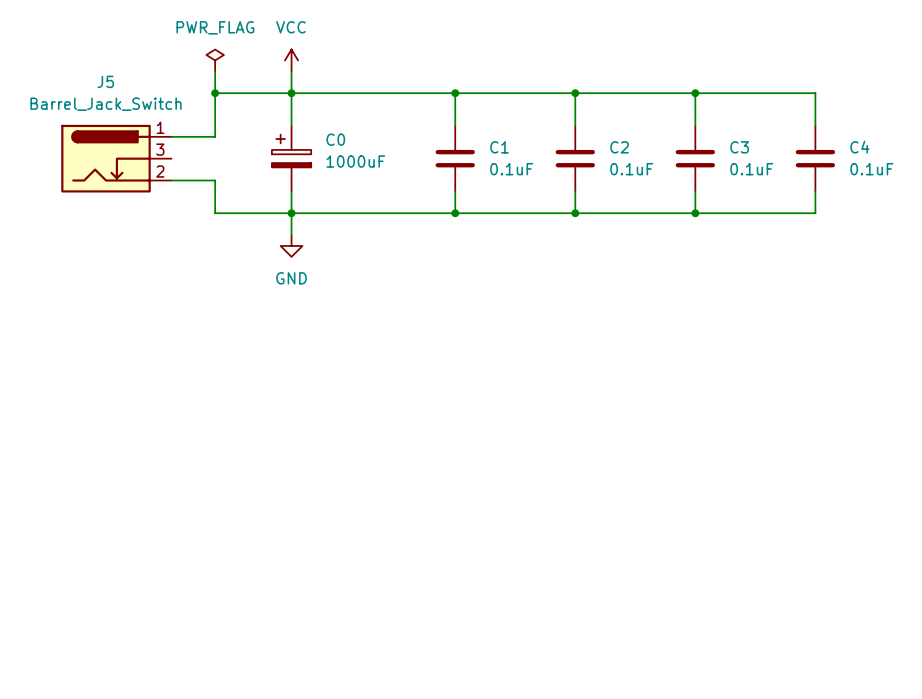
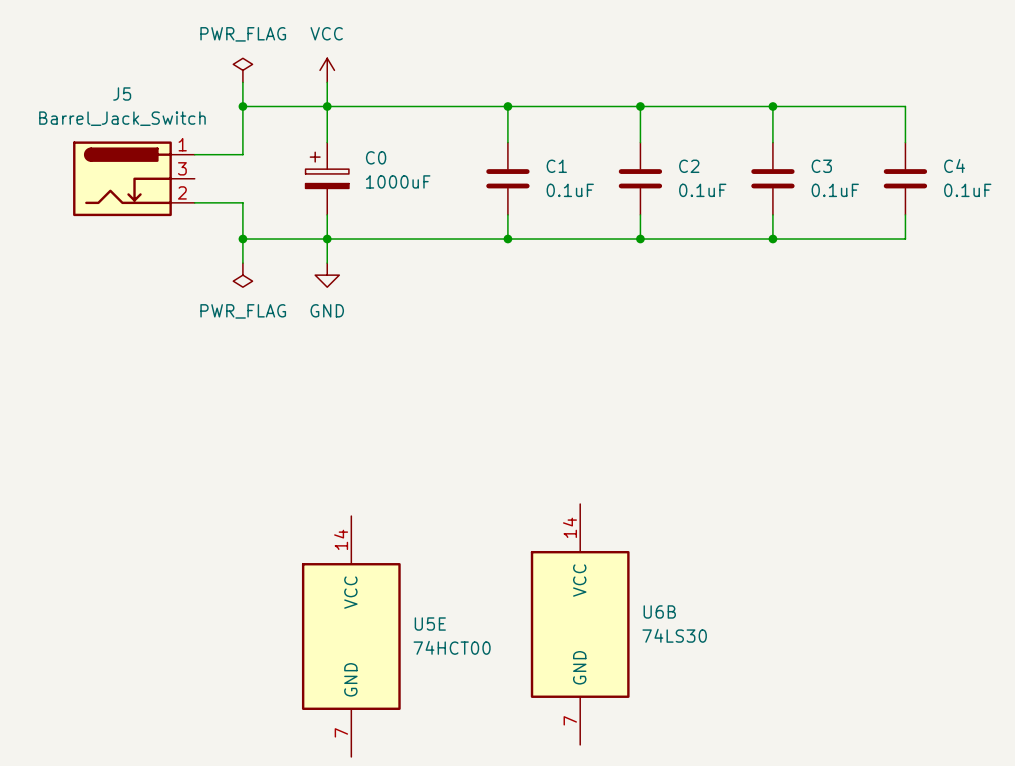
wire: none -> (242, 239) (242, 263)
junction: none -> (242, 239)
power symbol: none -> PWR_FLAG (242, 275)
U6B: none -> 74LS30 (580, 624)
U5E: none -> 74HCT00 (351, 636)

